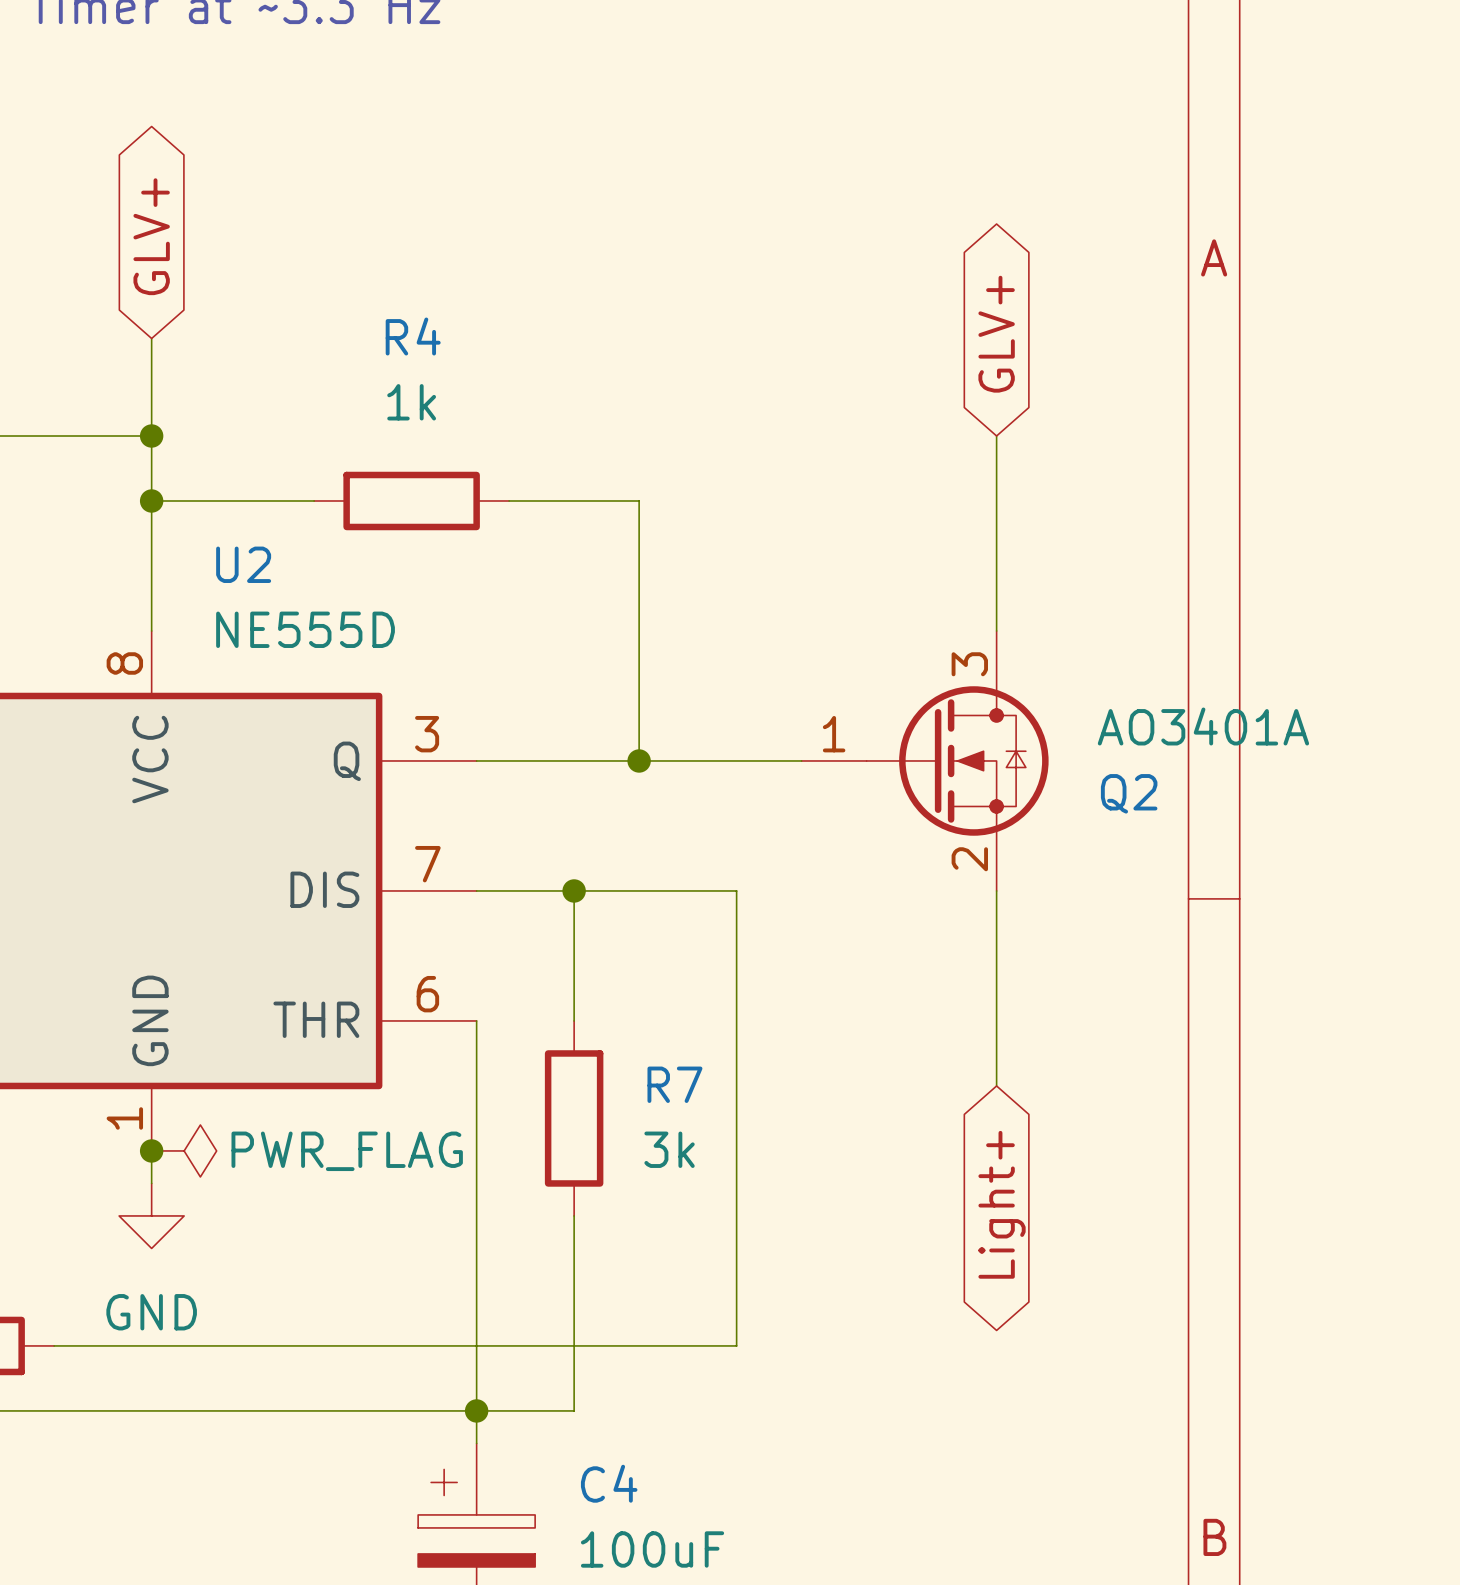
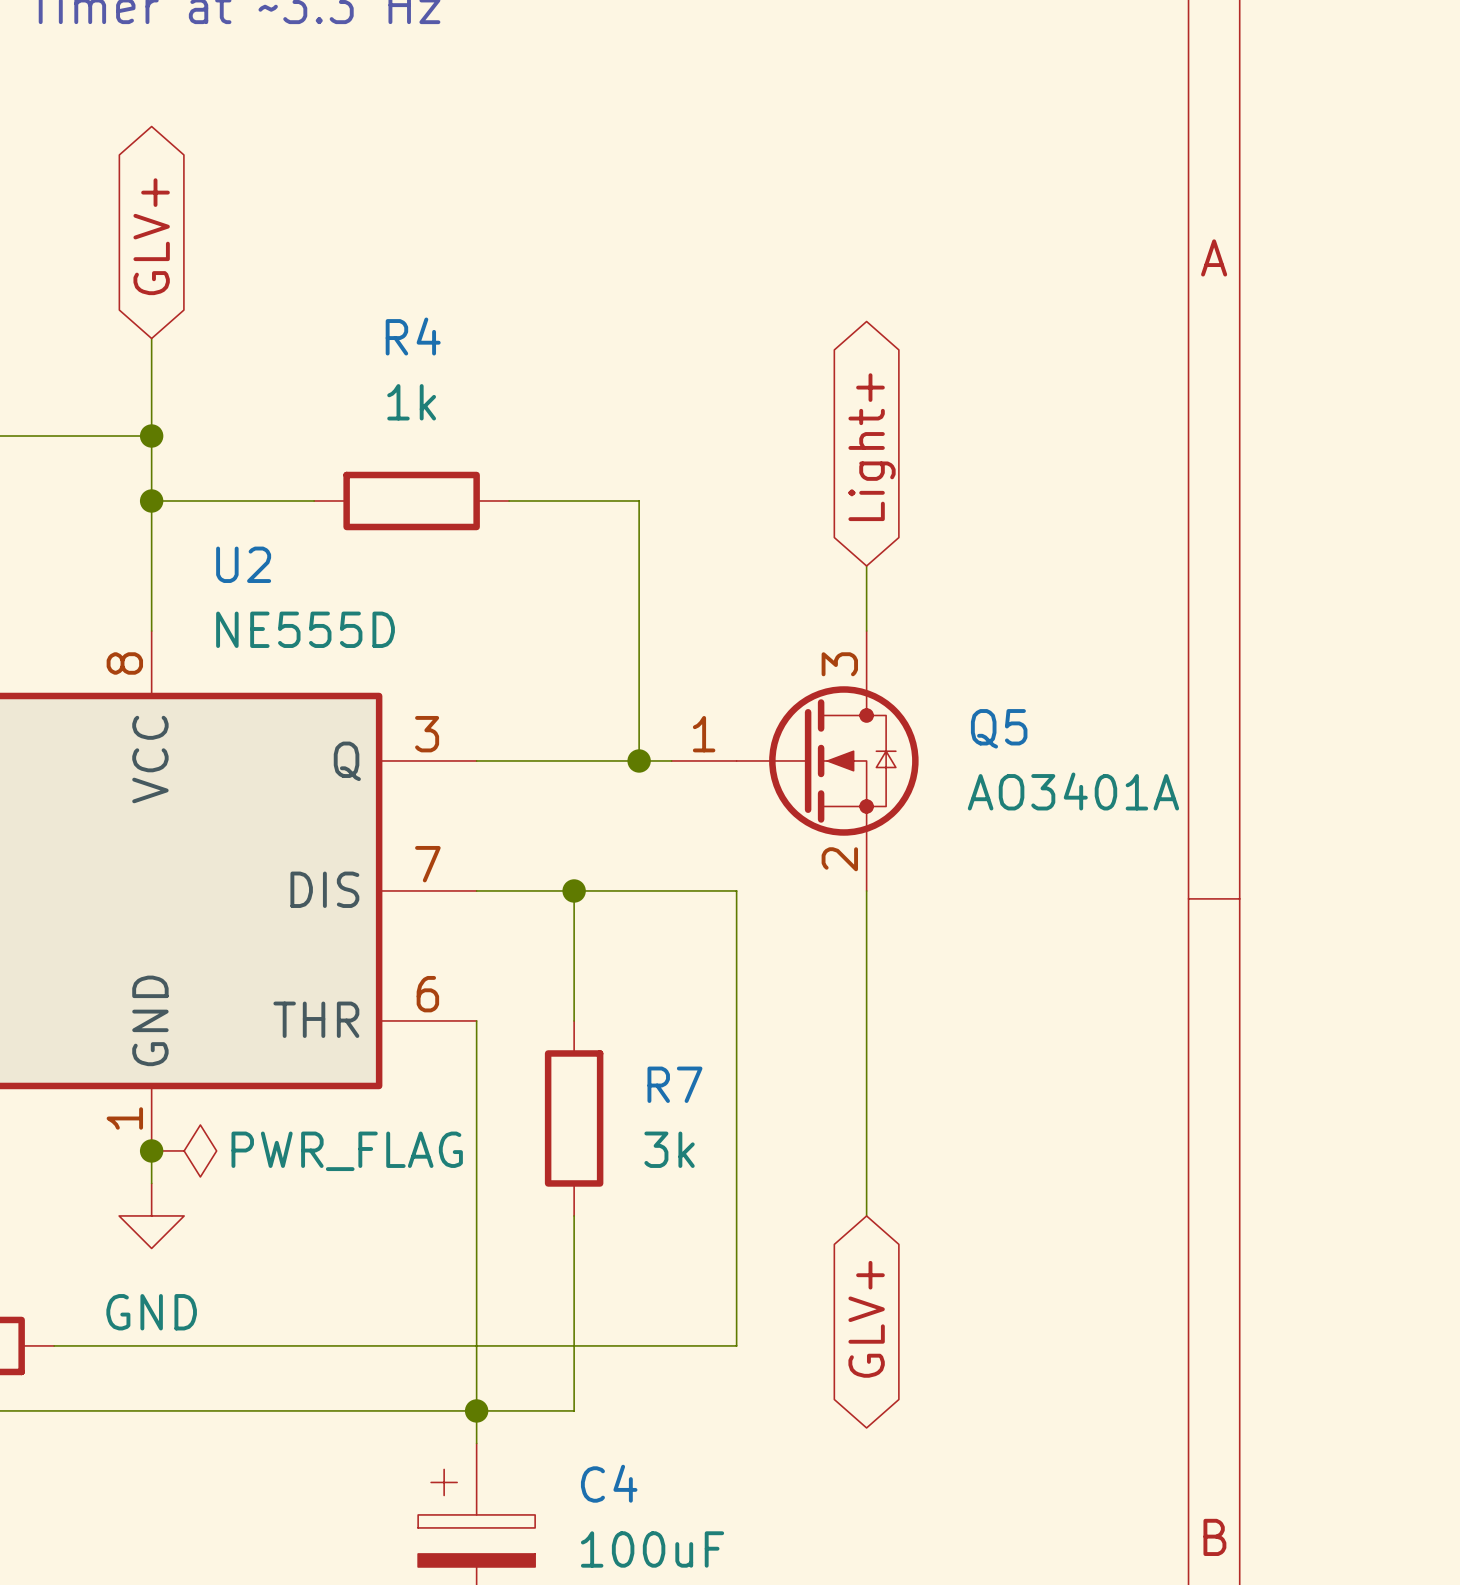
global label: GLV+ (996, 334) -> none
wire: (996, 436) (996, 630) -> none
wire: none -> (866, 565) (866, 630)
Q5: none -> AO3401A (795, 760)
Q2: AO3401A (925, 760) -> none
wire: none -> (866, 890) (866, 1215)
wire: (996, 890) (996, 1085) -> none
global label rotation: 0° (1002, 1204) -> 180° (872, 447)
global label position: Light+ (1002, 1204) -> Light+ (872, 447)
global label: none -> GLV+ (866, 1319)

